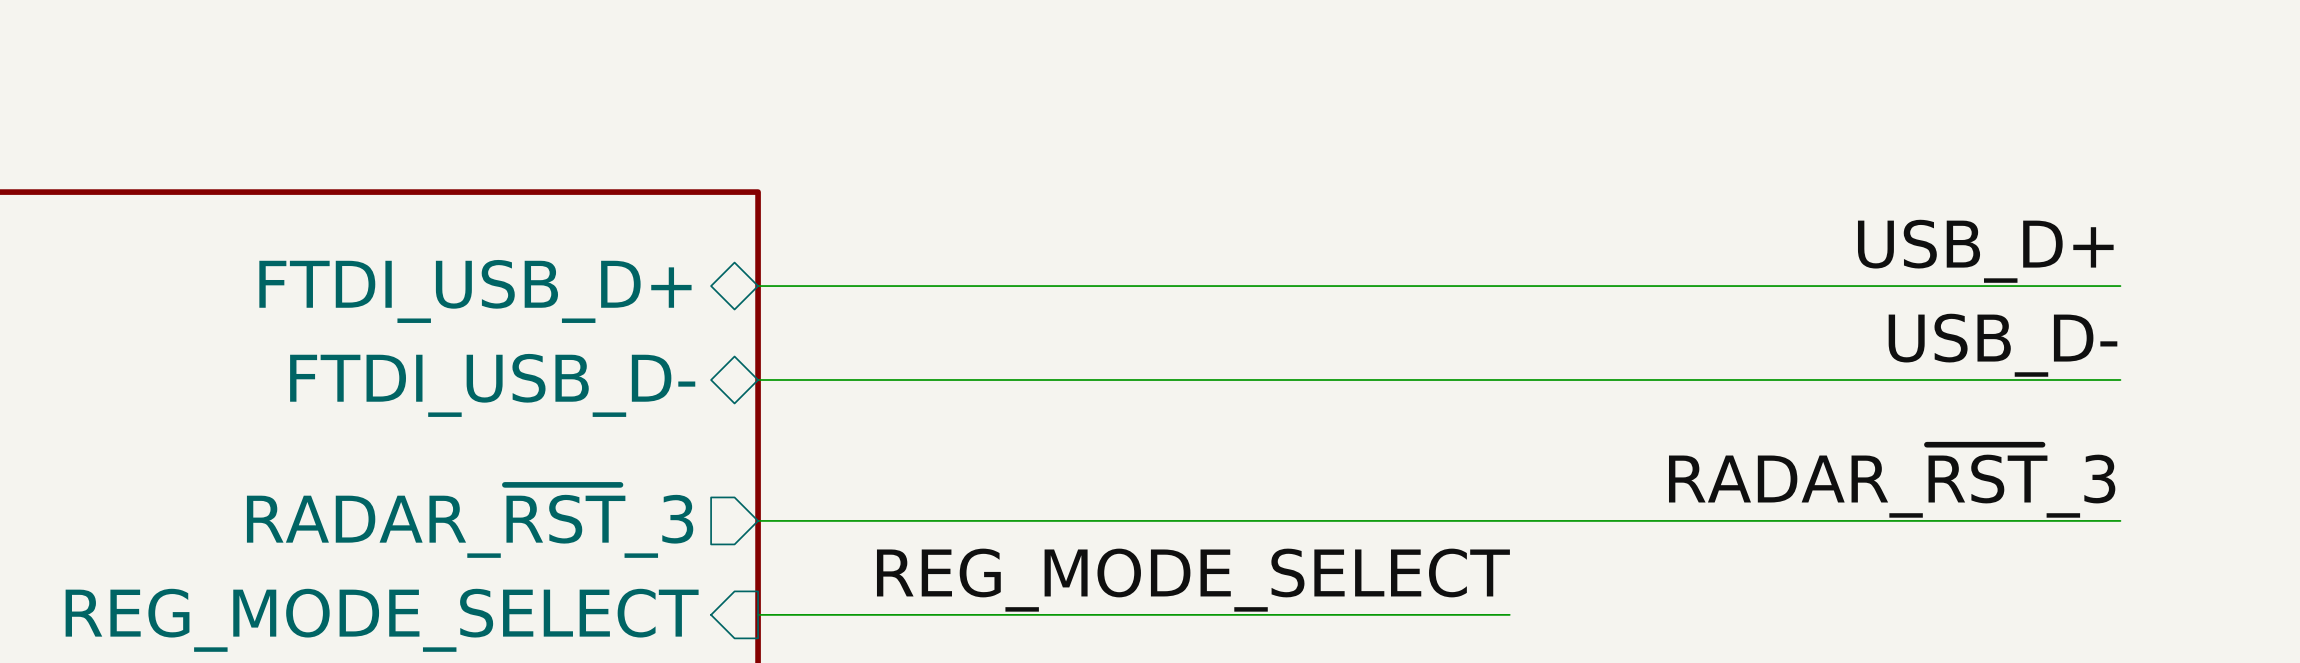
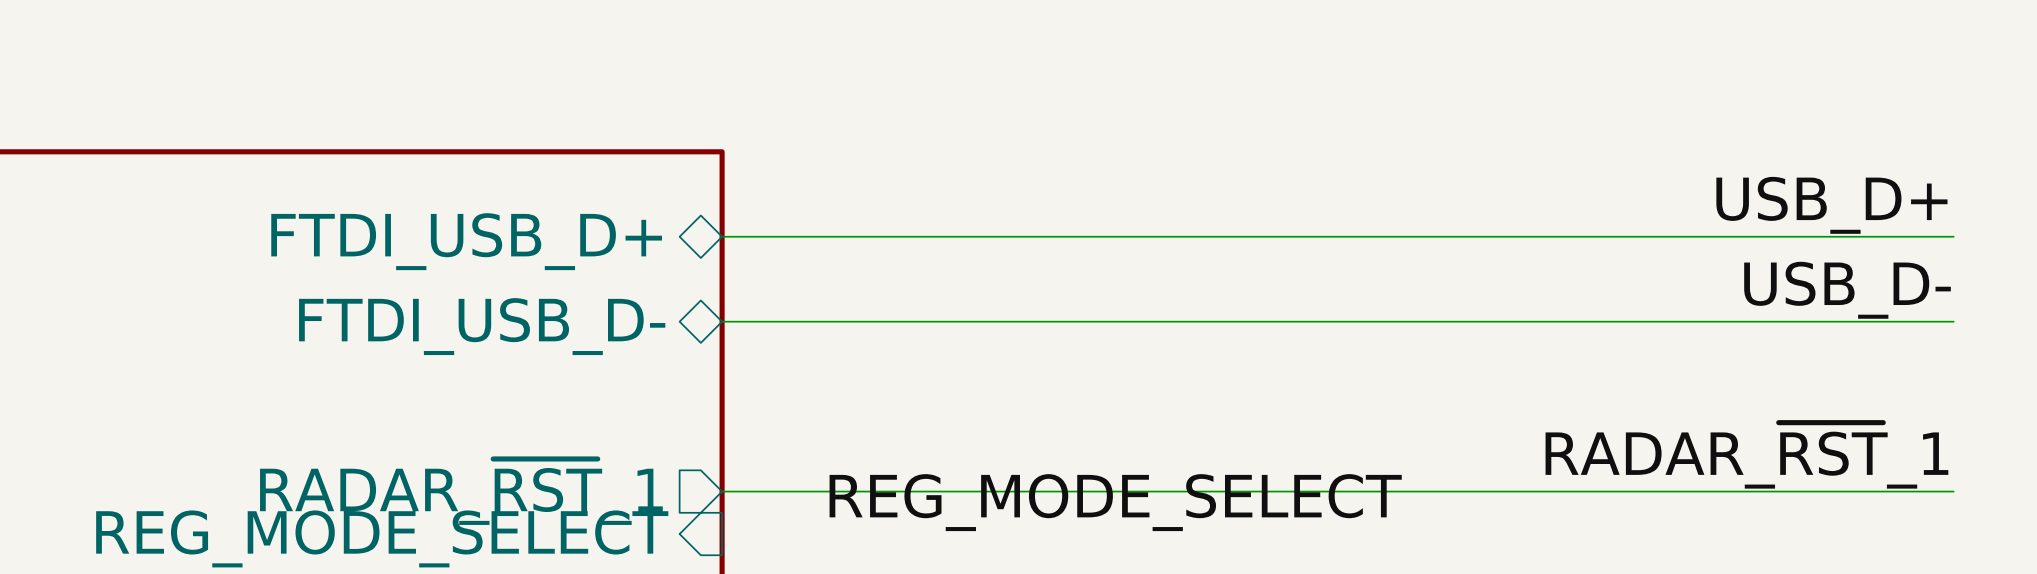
label: RADAR_~{RST}_3 (1892, 481) -> RADAR_~{RST}_1 (1746, 455)
wire: (758, 520) (2120, 520) -> (722, 491) (1953, 491)
sheet pin: RADAR_~{RST}_3 (470, 521) -> RADAR_~{RST}_1 (461, 491)
wire: (758, 614) (1509, 614) -> none

